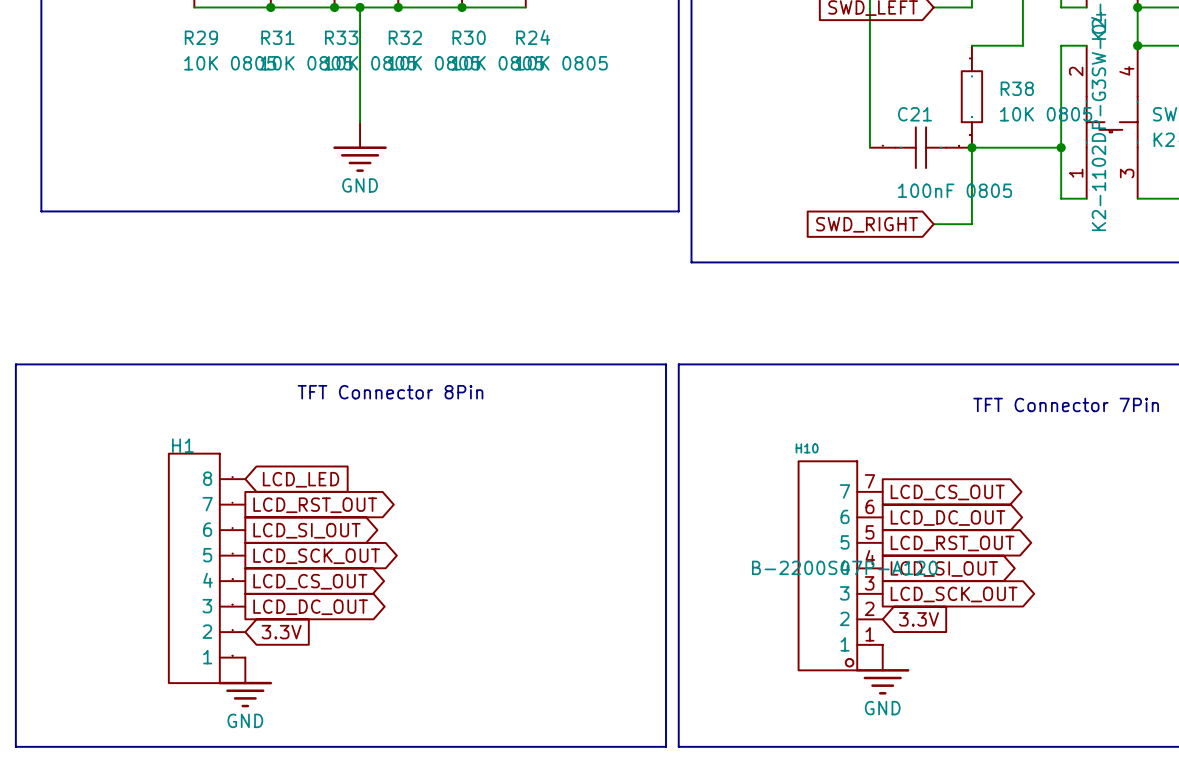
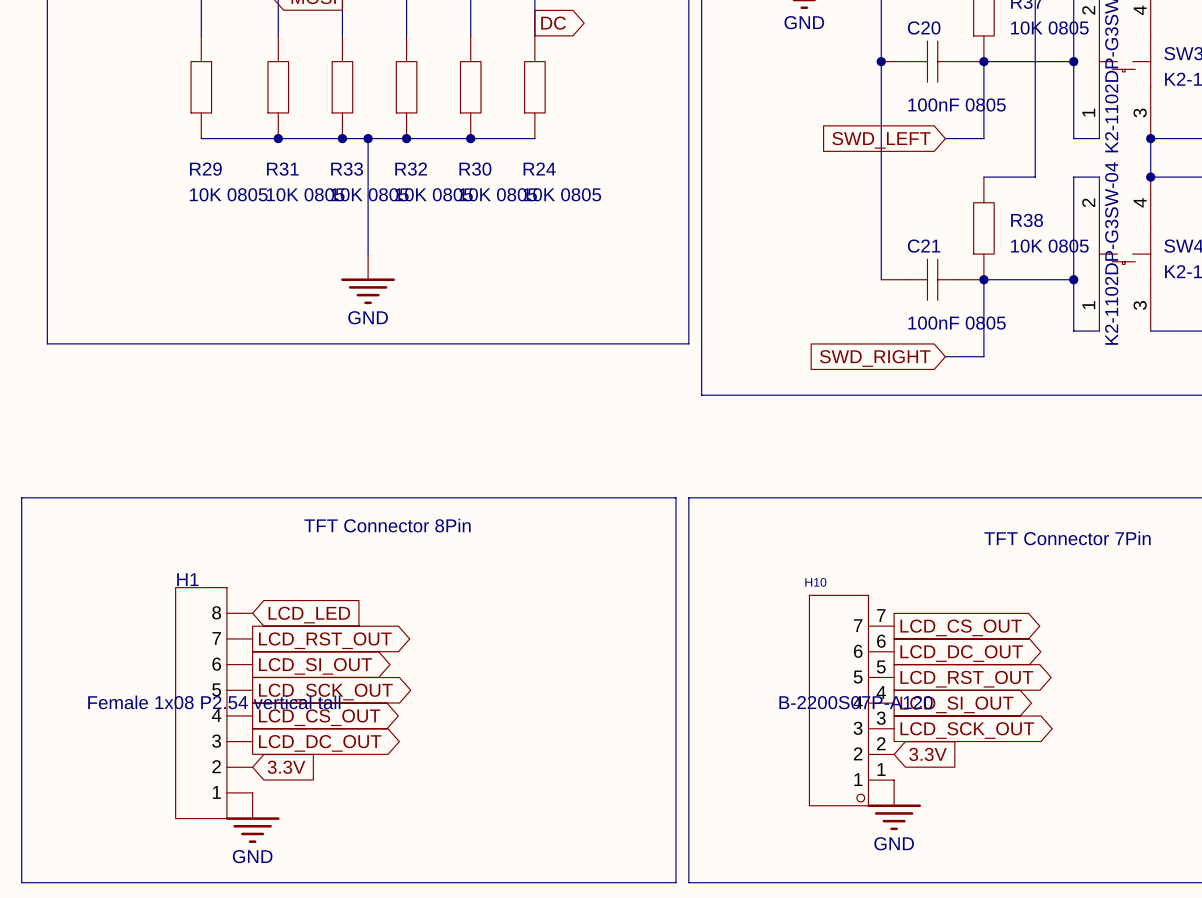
H1 value: none -> Female 1x08 P2.54 vertical tall (214, 702)

